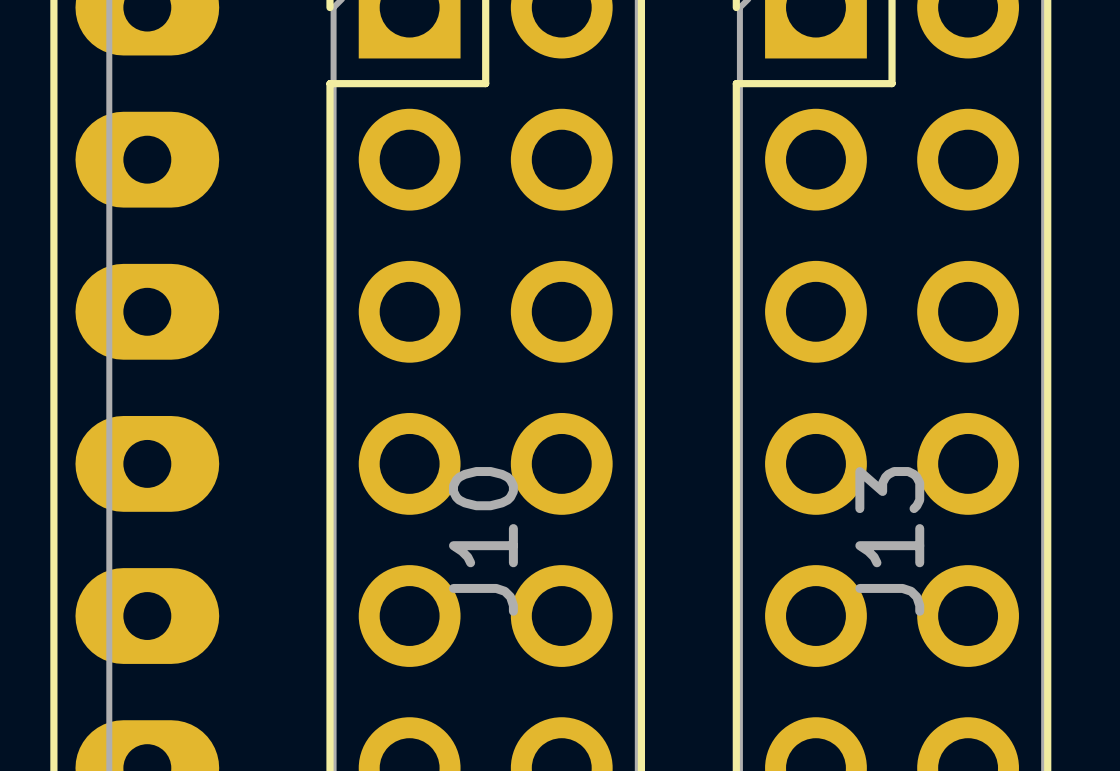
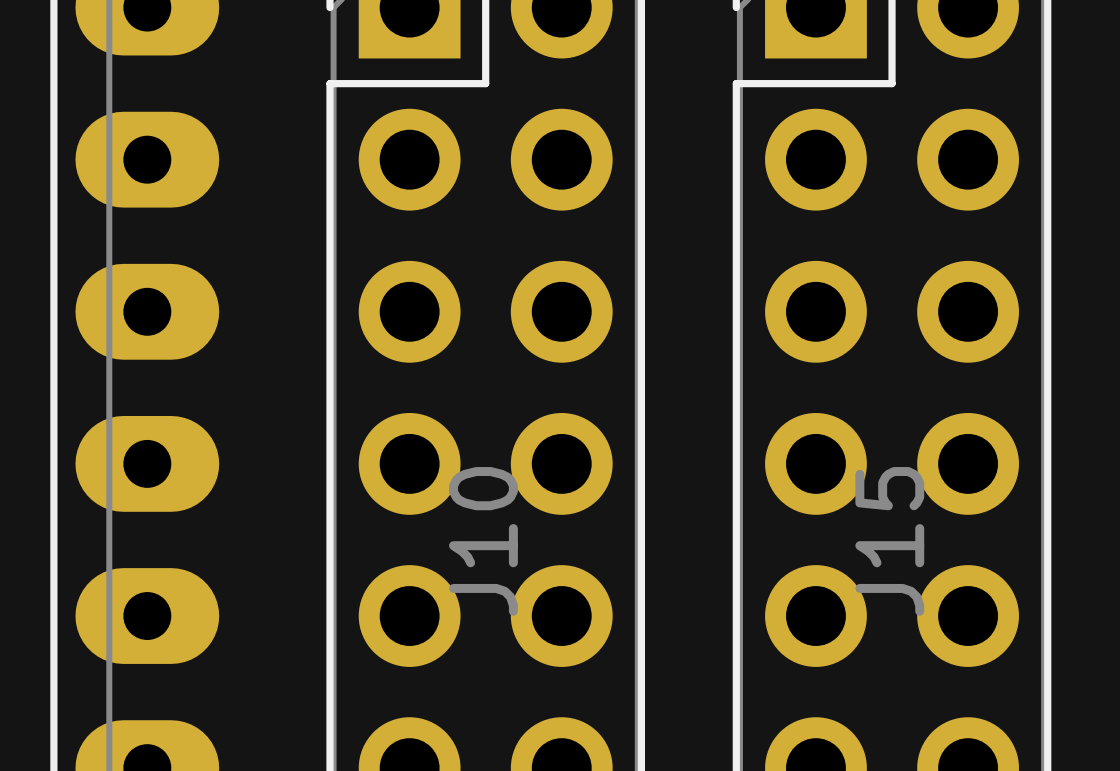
J13 name: J13 (889, 541) -> J15 (889, 541)

